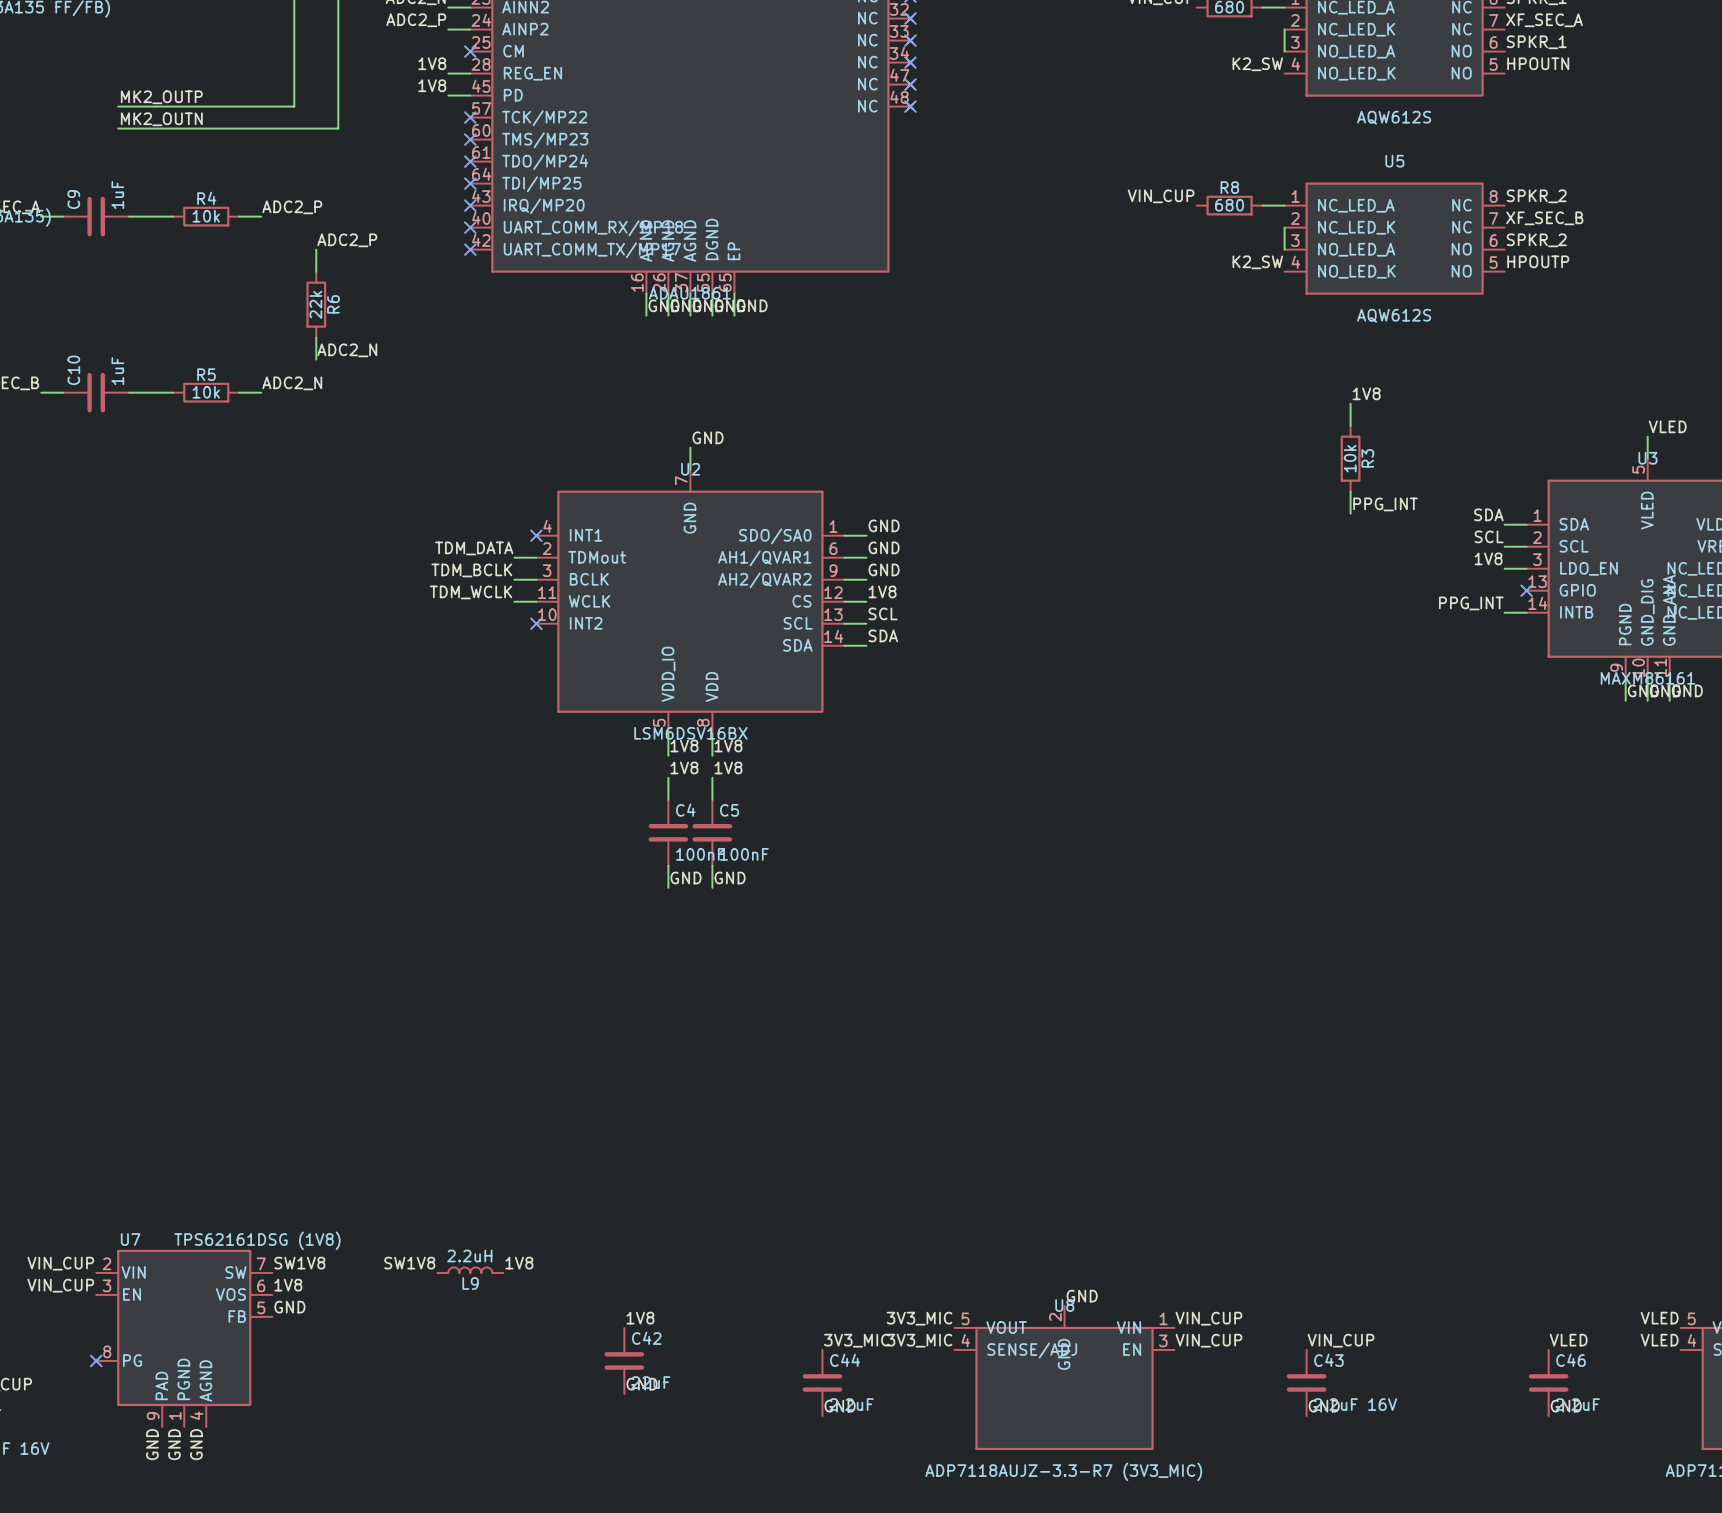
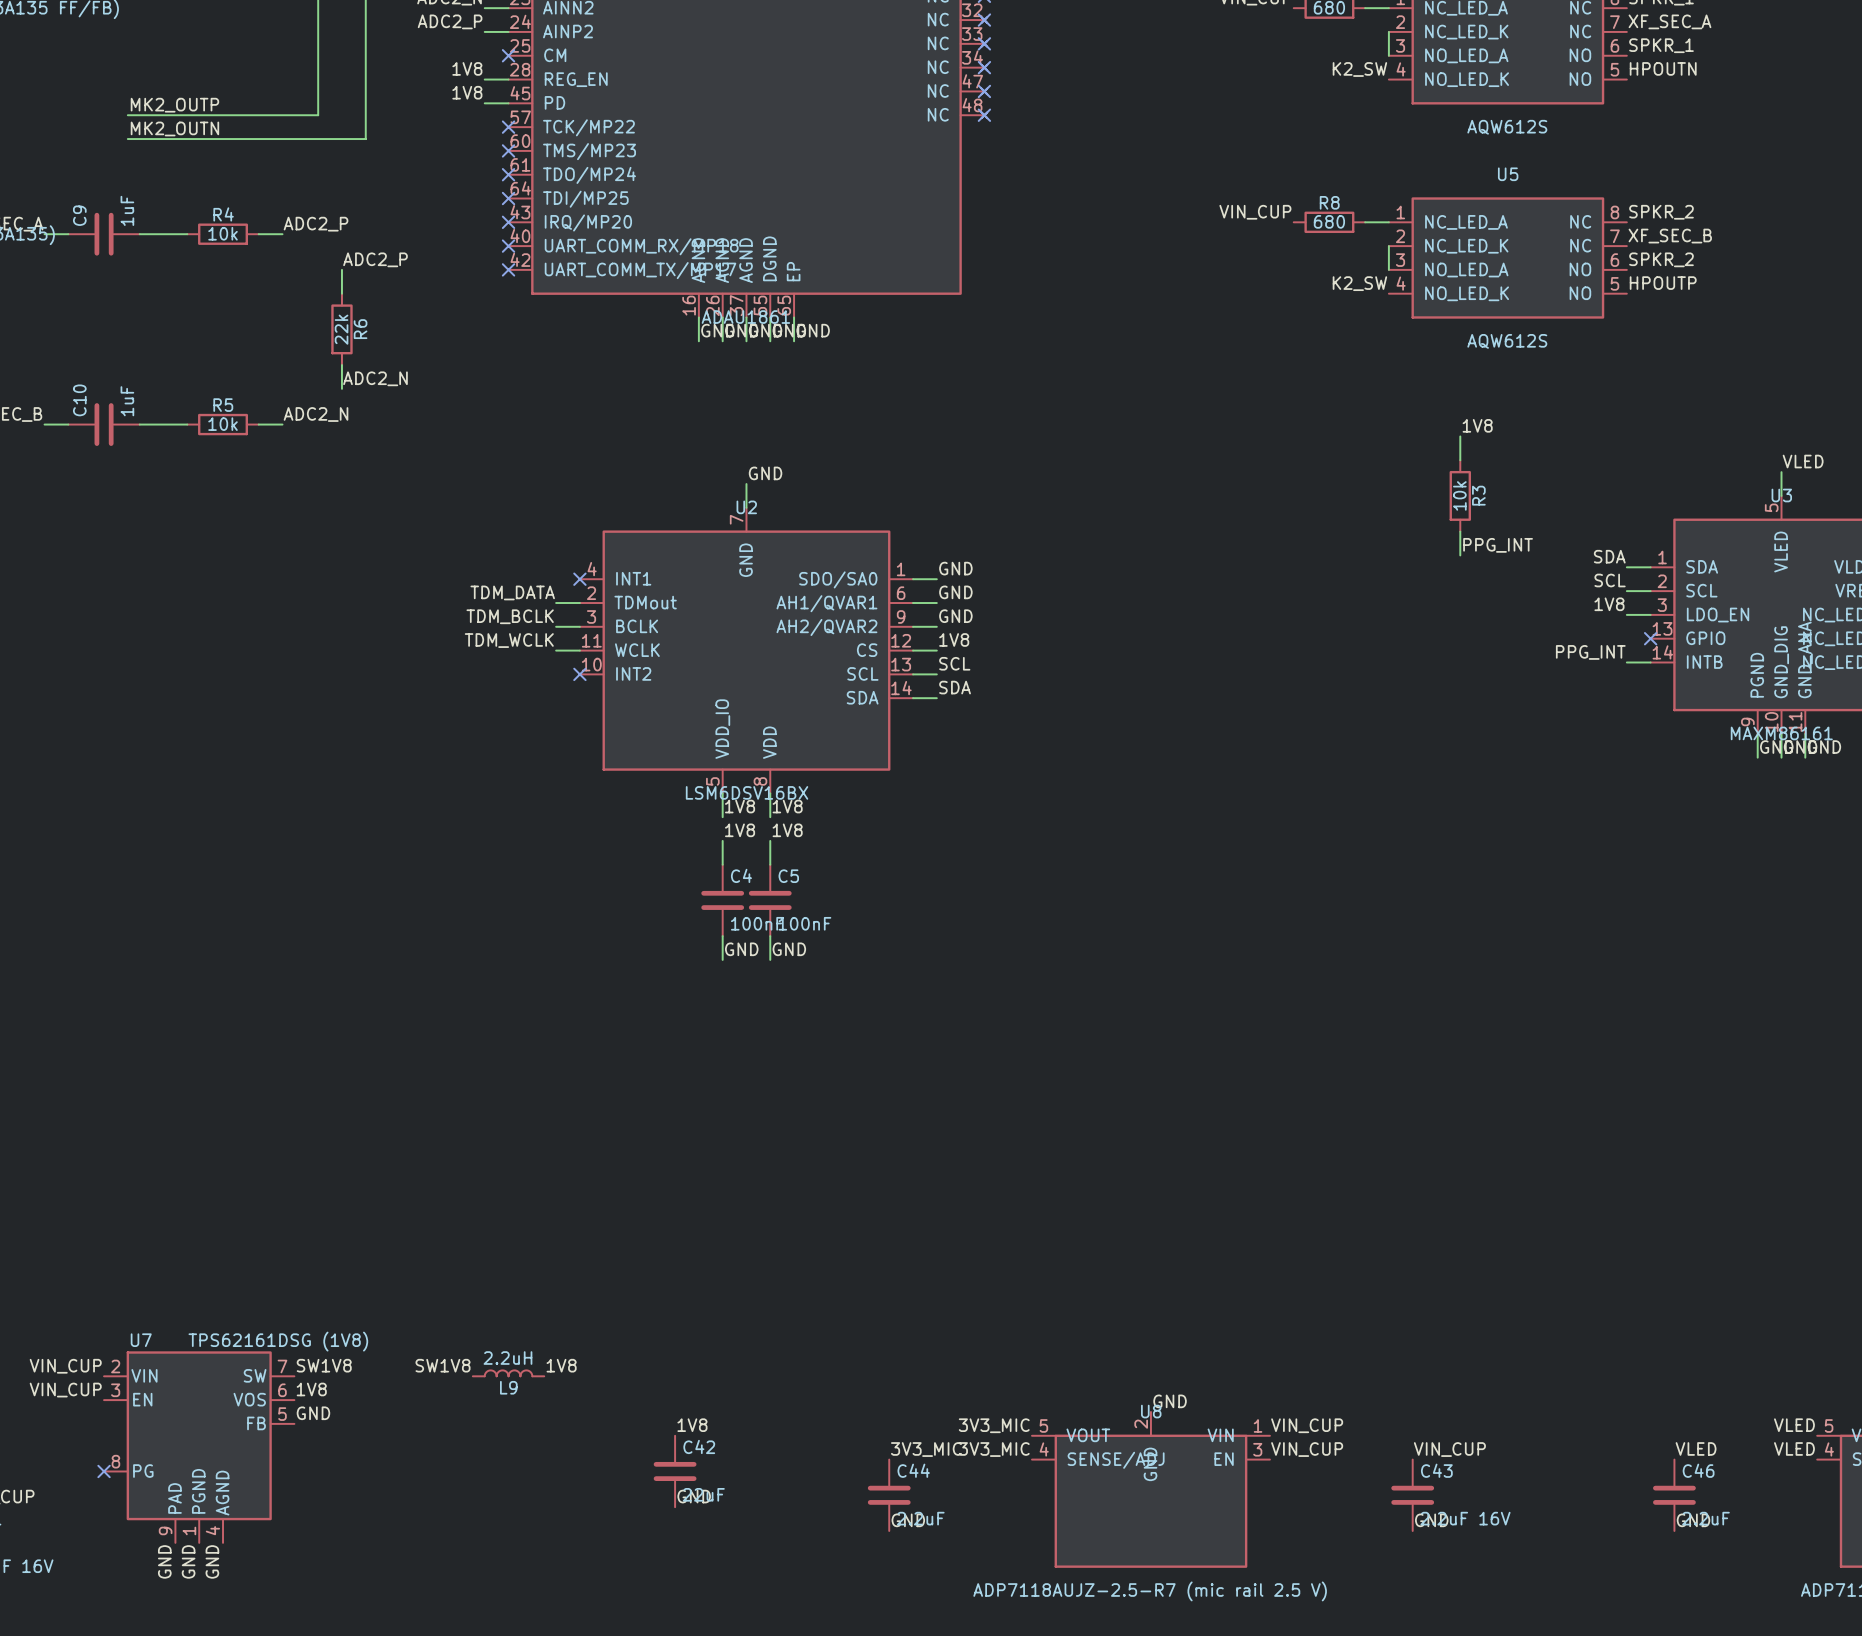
U8 value: ADP7118AUJZ-3.3-R7 (3V3_MIC) (1063, 1471) -> ADP7118AUJZ-2.5-R7 (mic rail 2.5 V) (1150, 1591)

